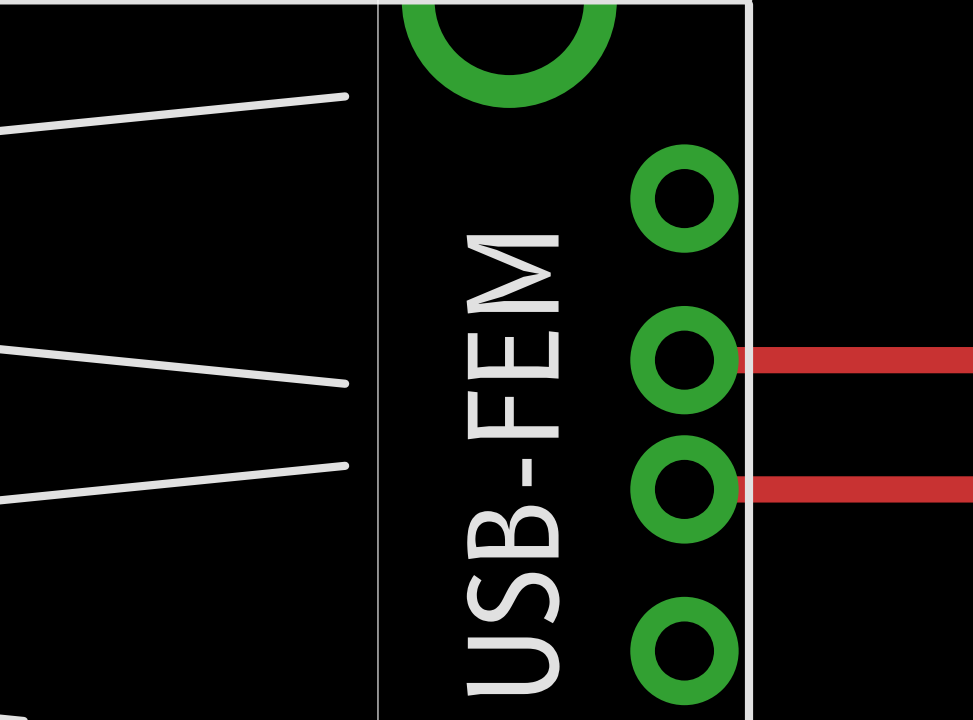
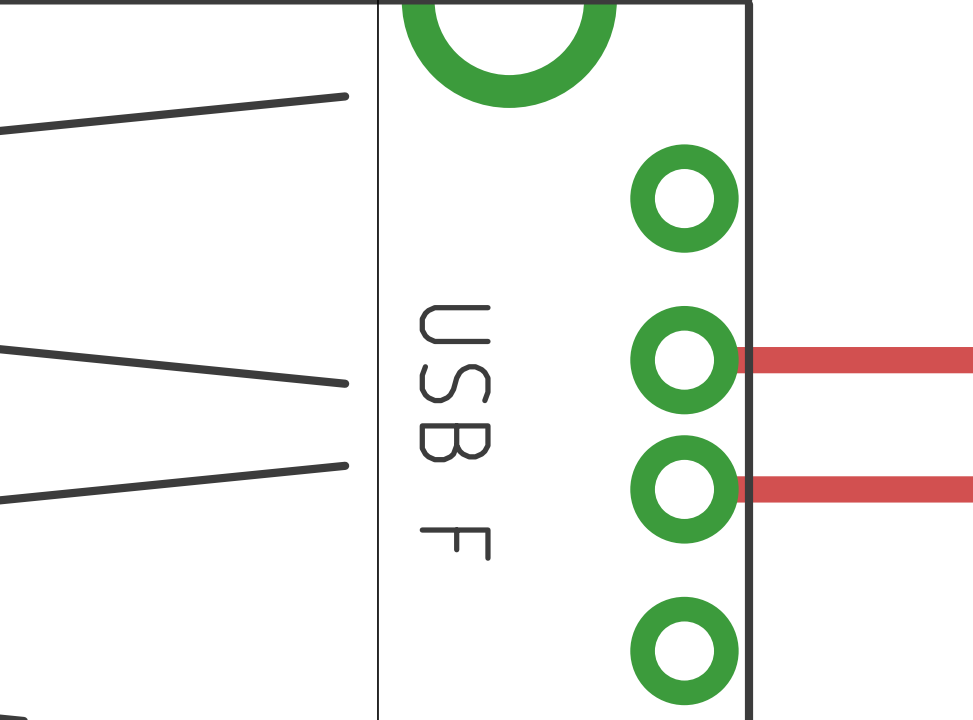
text: USB-FEM (513, 465) -> USB F (455, 432)

